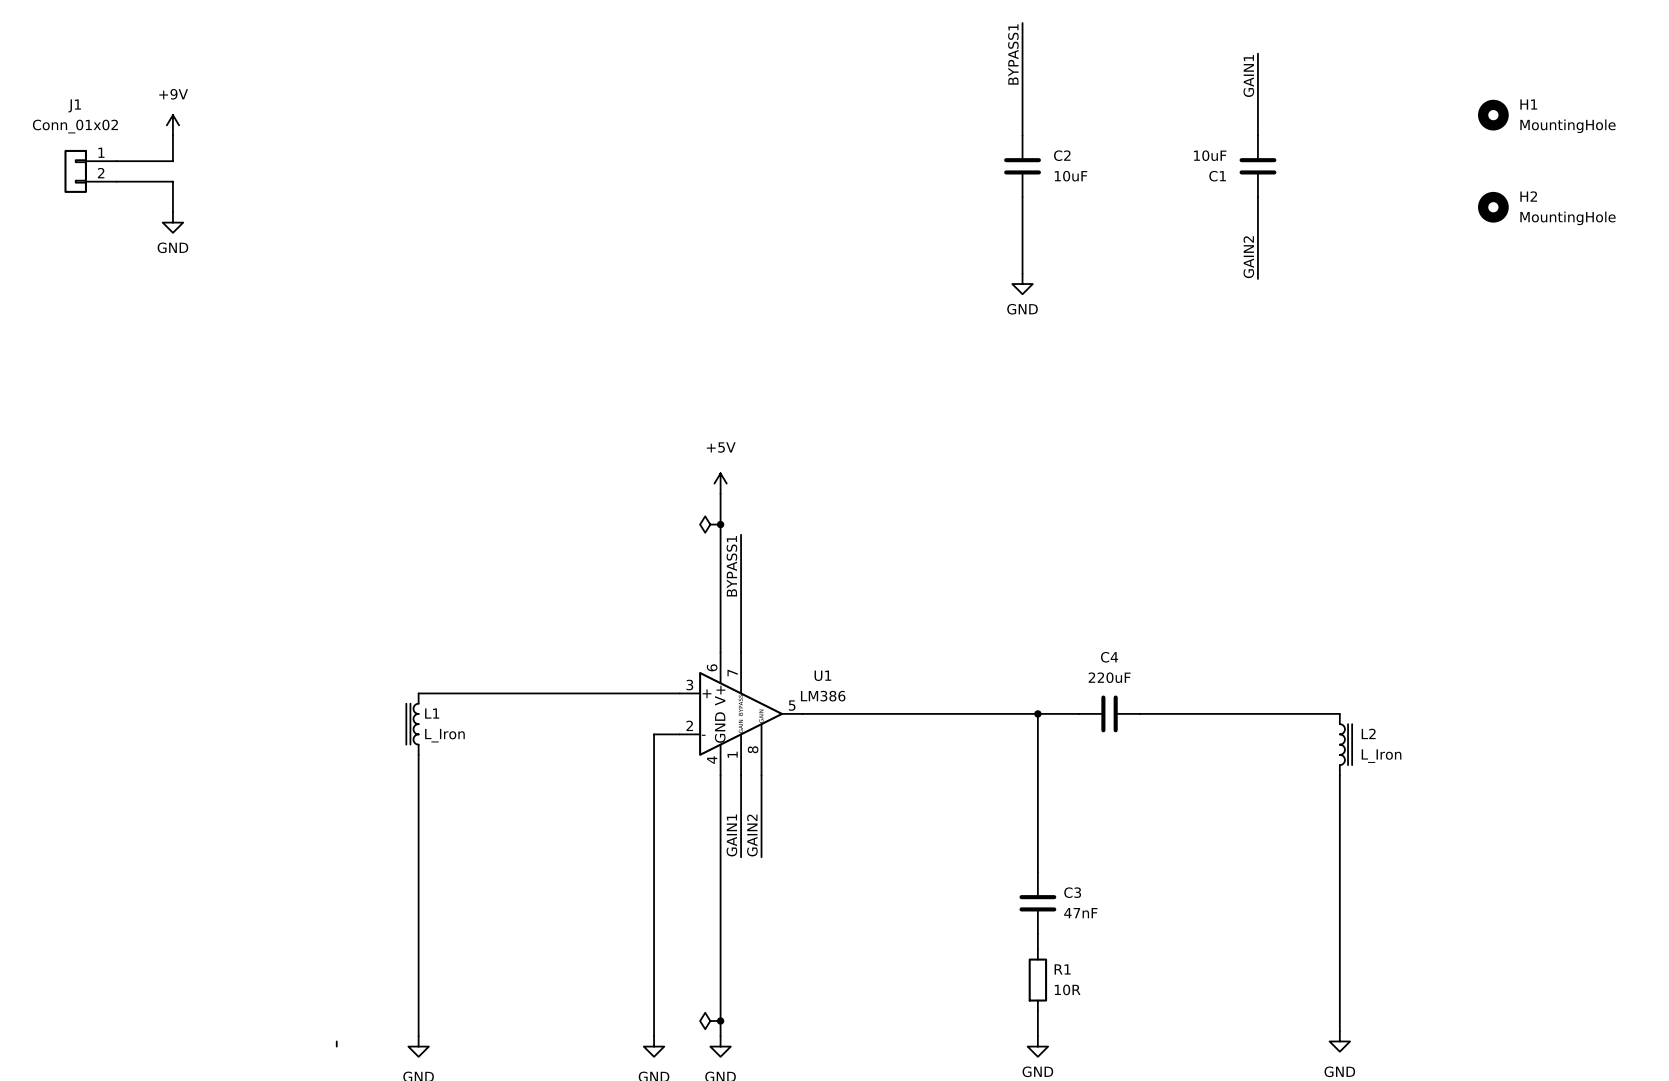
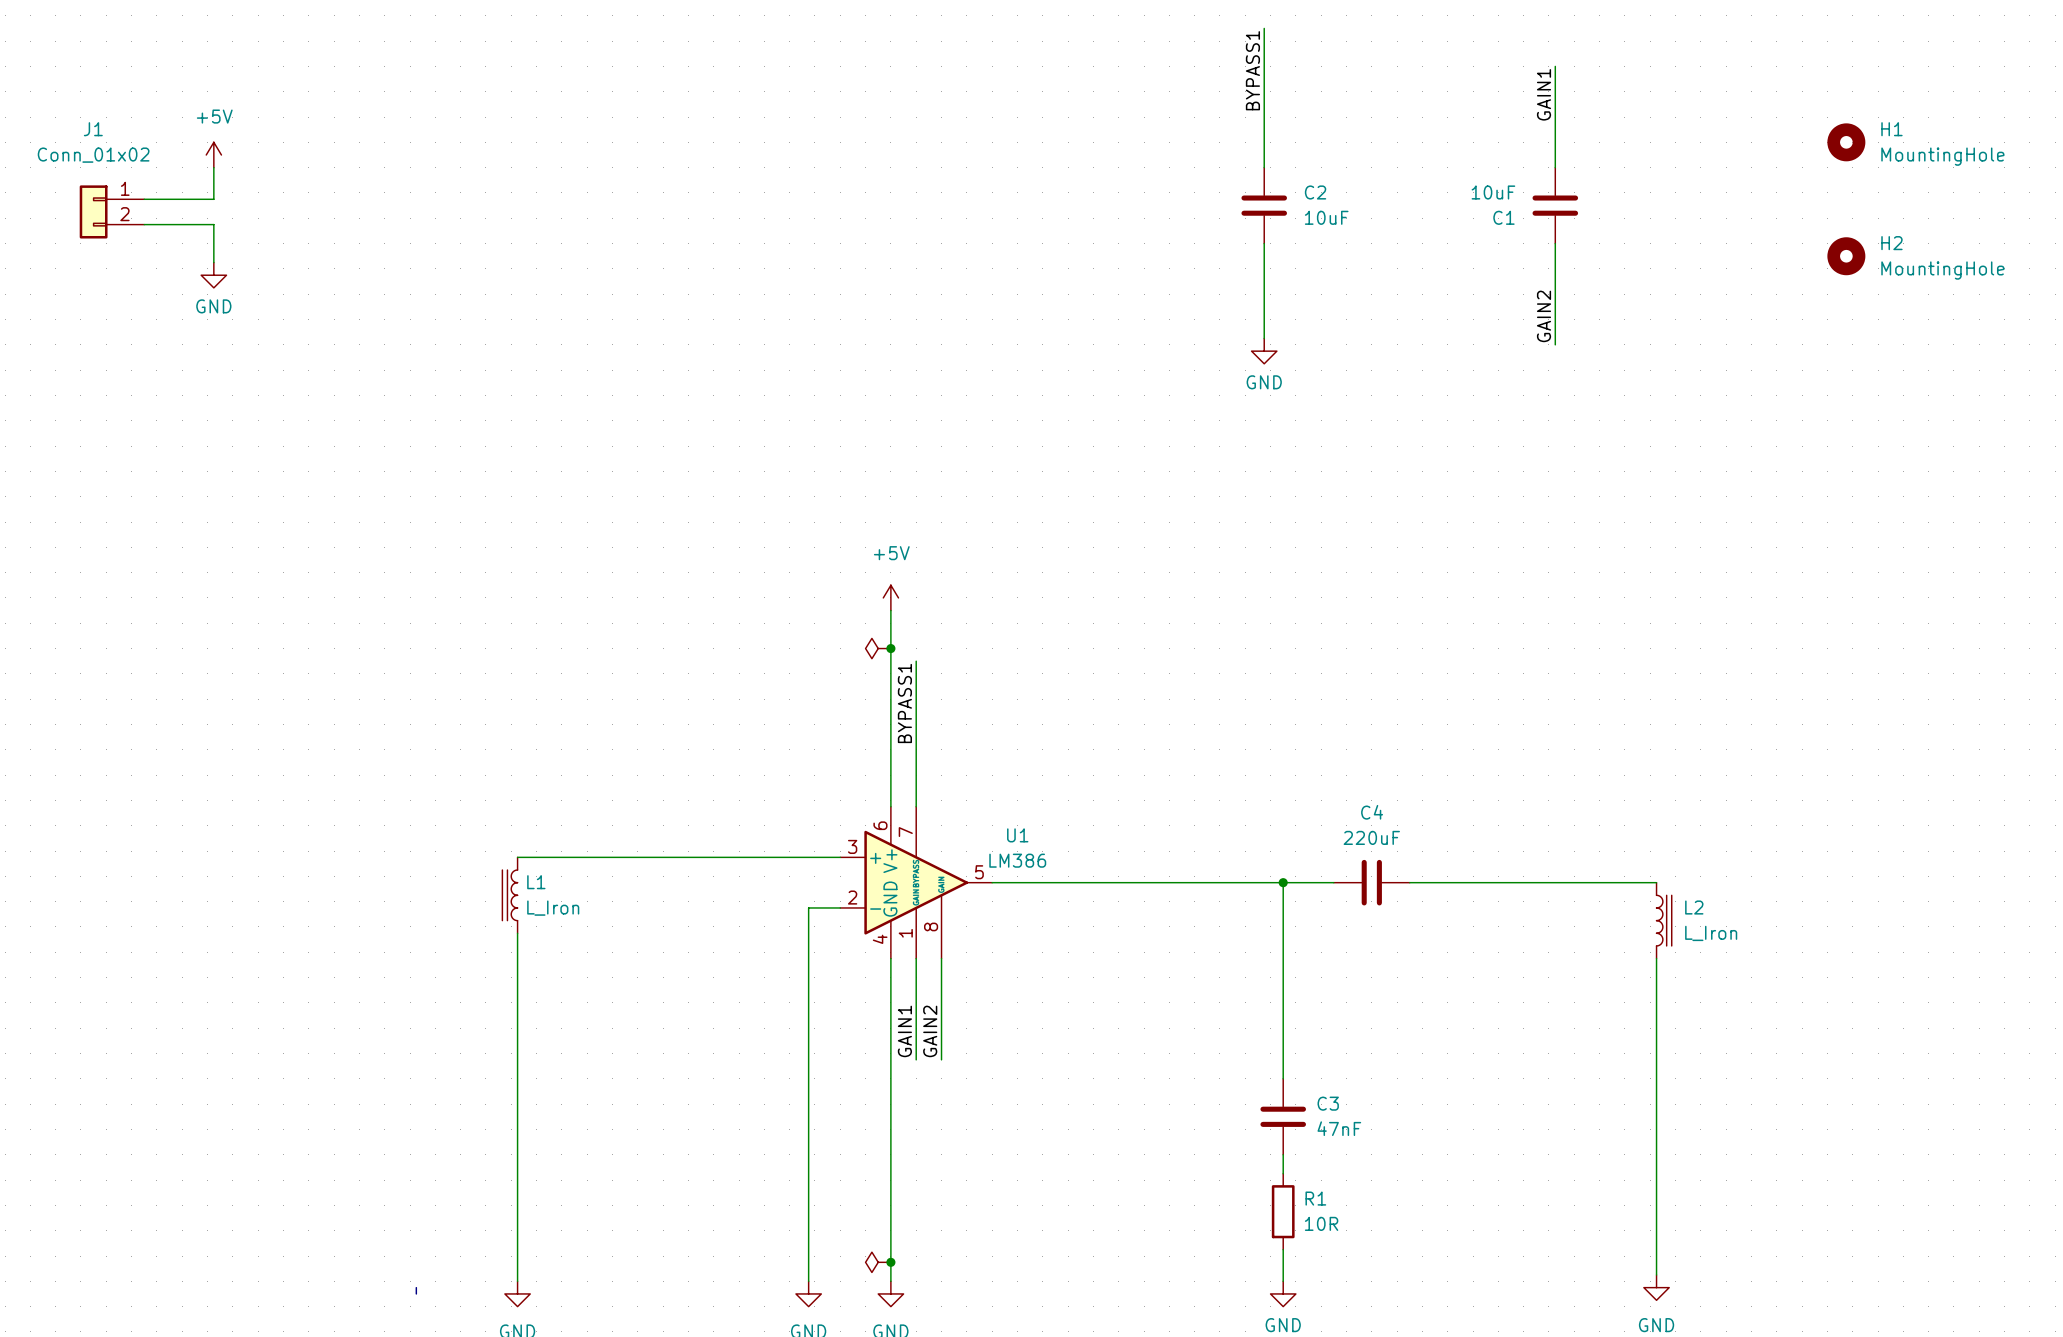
power symbol: +9V (172, 125) -> +5V (213, 155)

